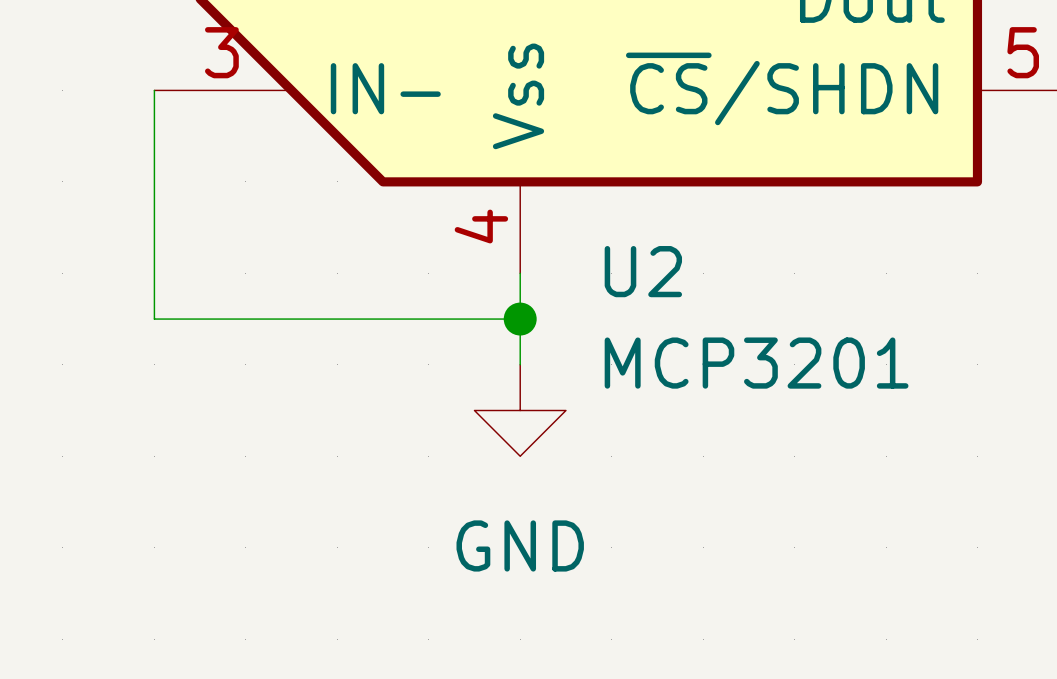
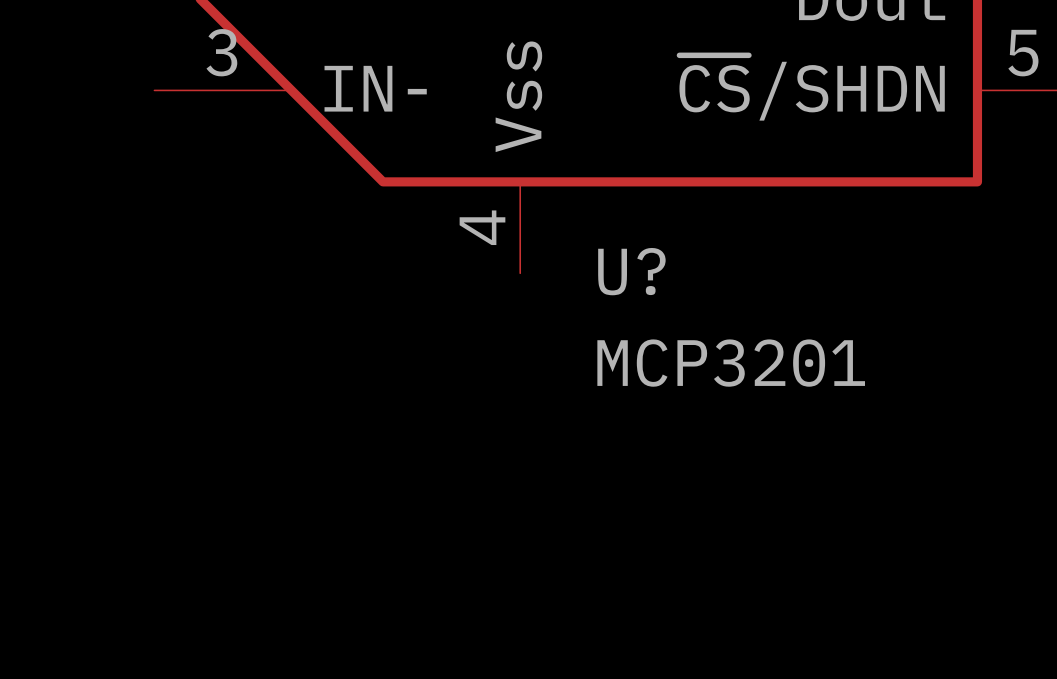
wire: (154, 90) (154, 319) (520, 319) -> none
U2 name: U2 (643, 271) -> U? (631, 271)
wire: (520, 273) (520, 364) -> none
junction: (520, 319) -> none
power symbol: GND (520, 410) -> none

